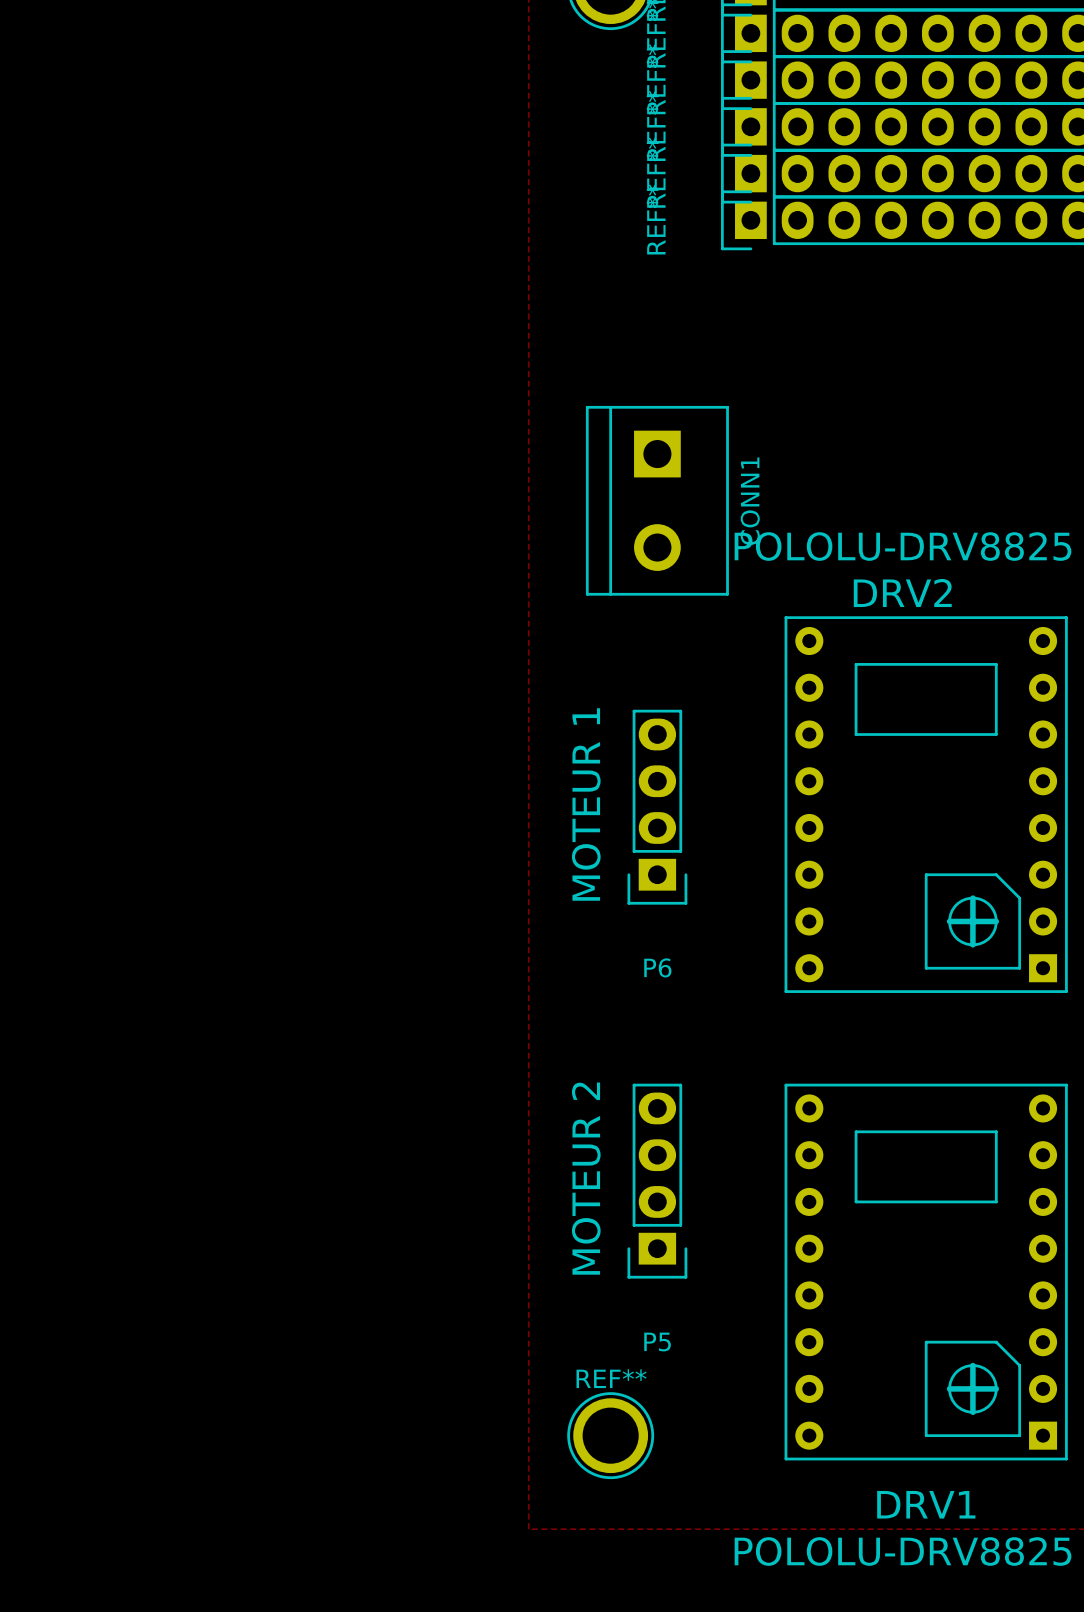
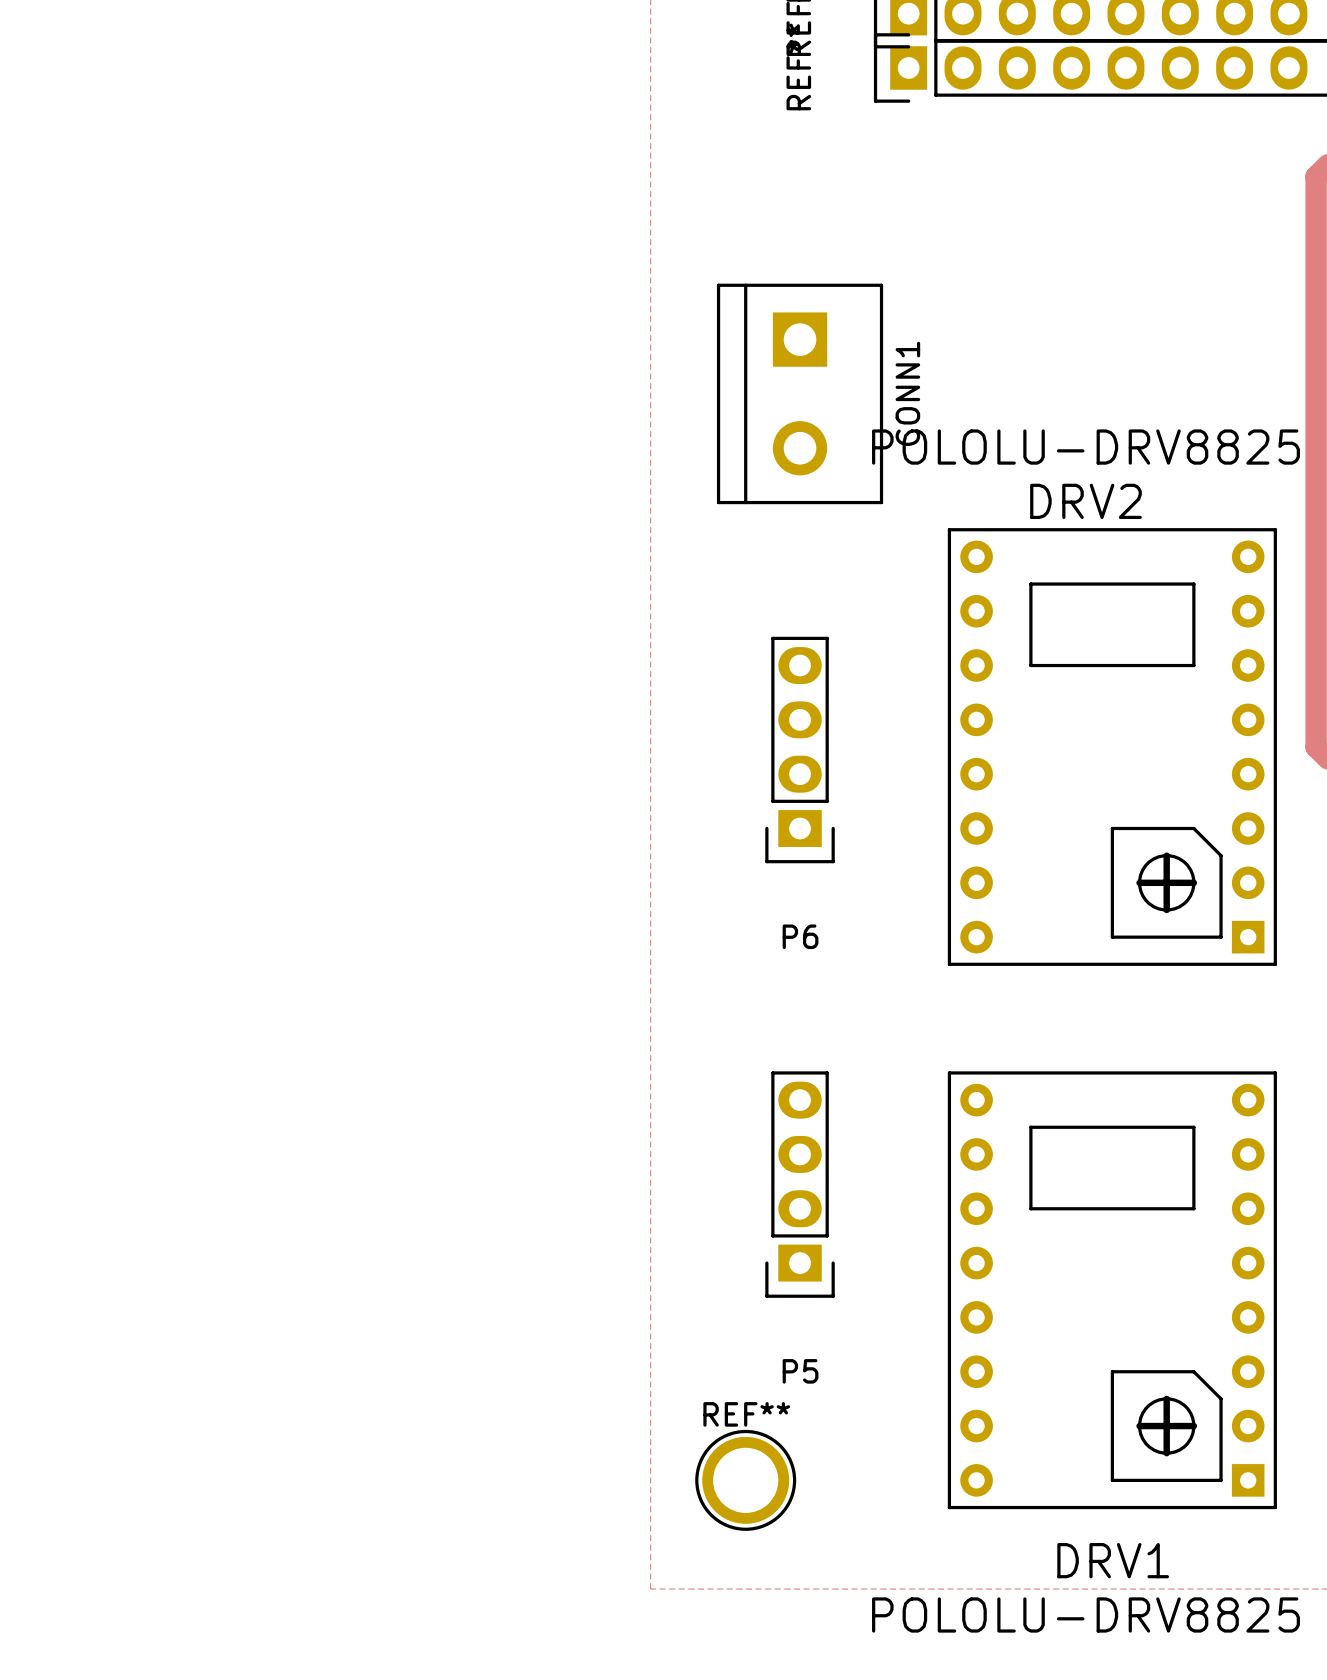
text: MOTEUR 1 (586, 804) -> none
text: MOTEUR 2 (586, 1178) -> none

